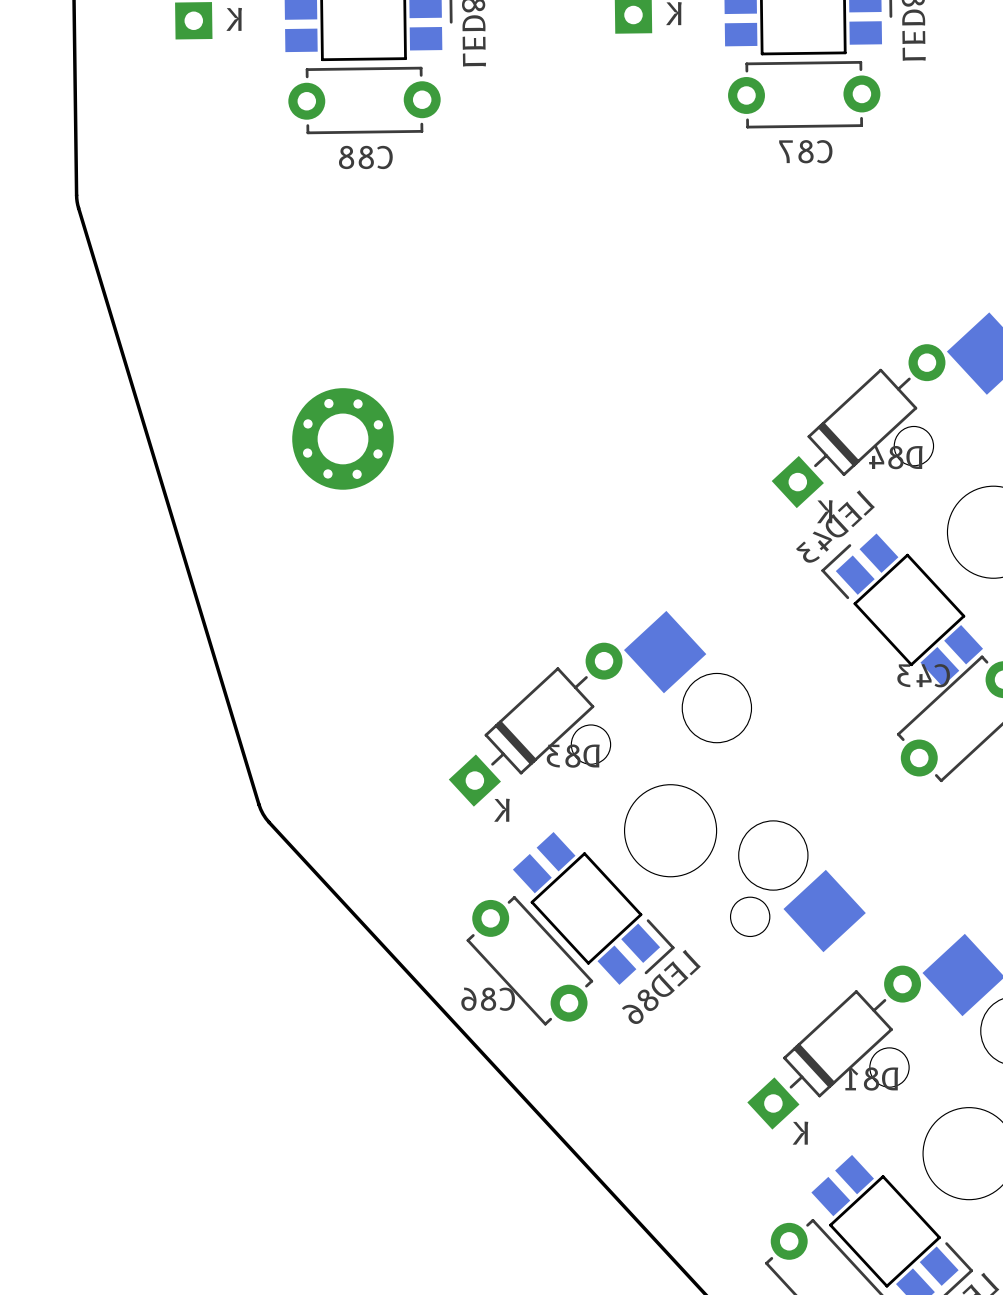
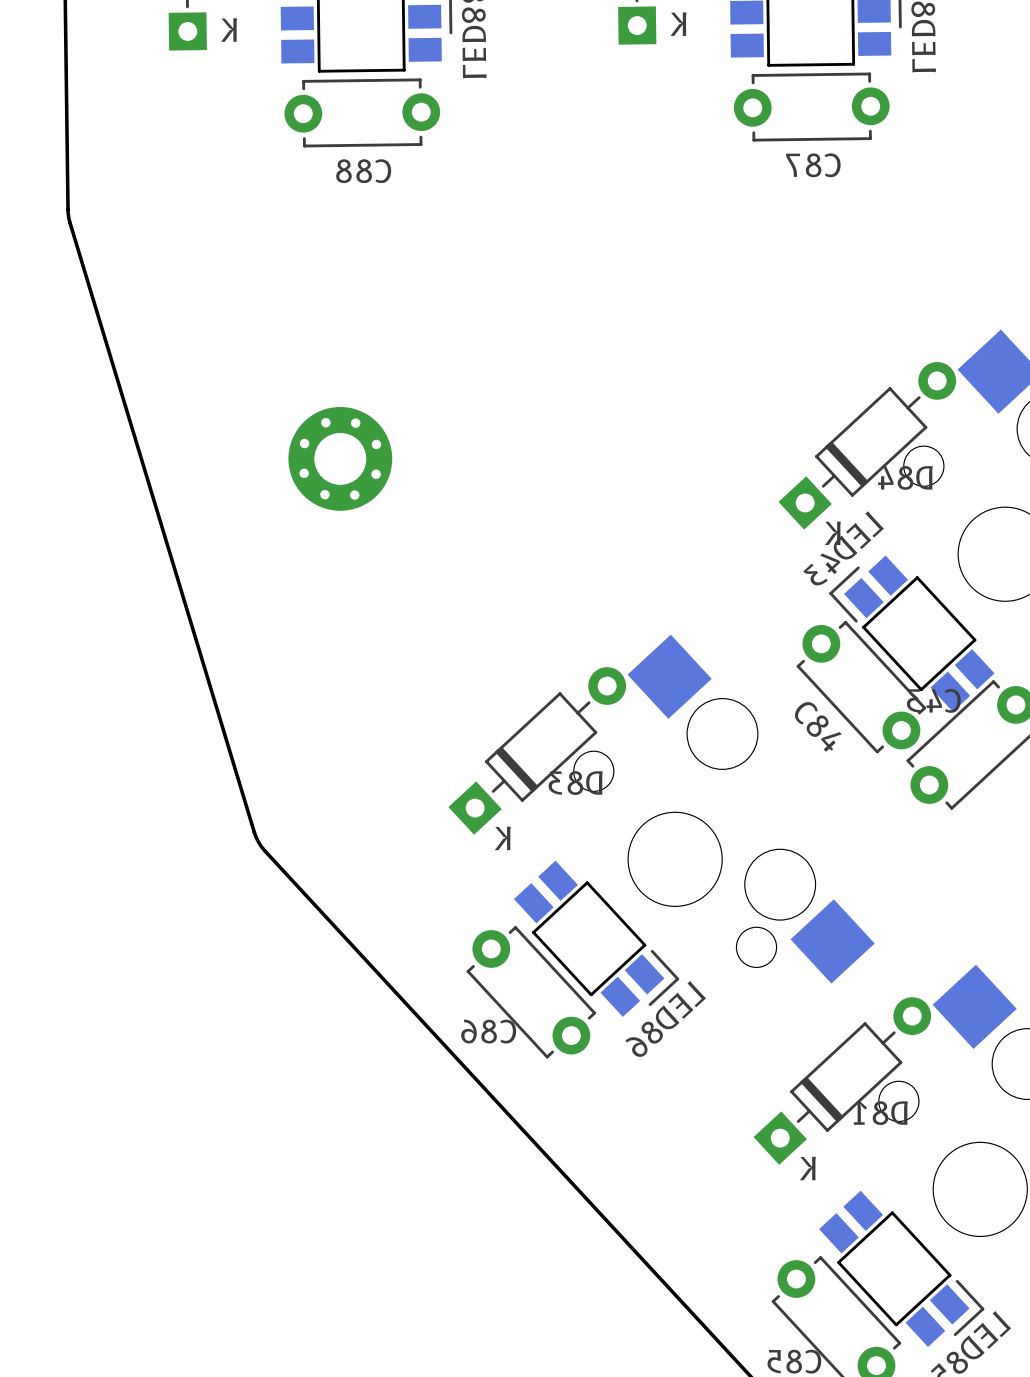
C84: none -> (861, 687)

